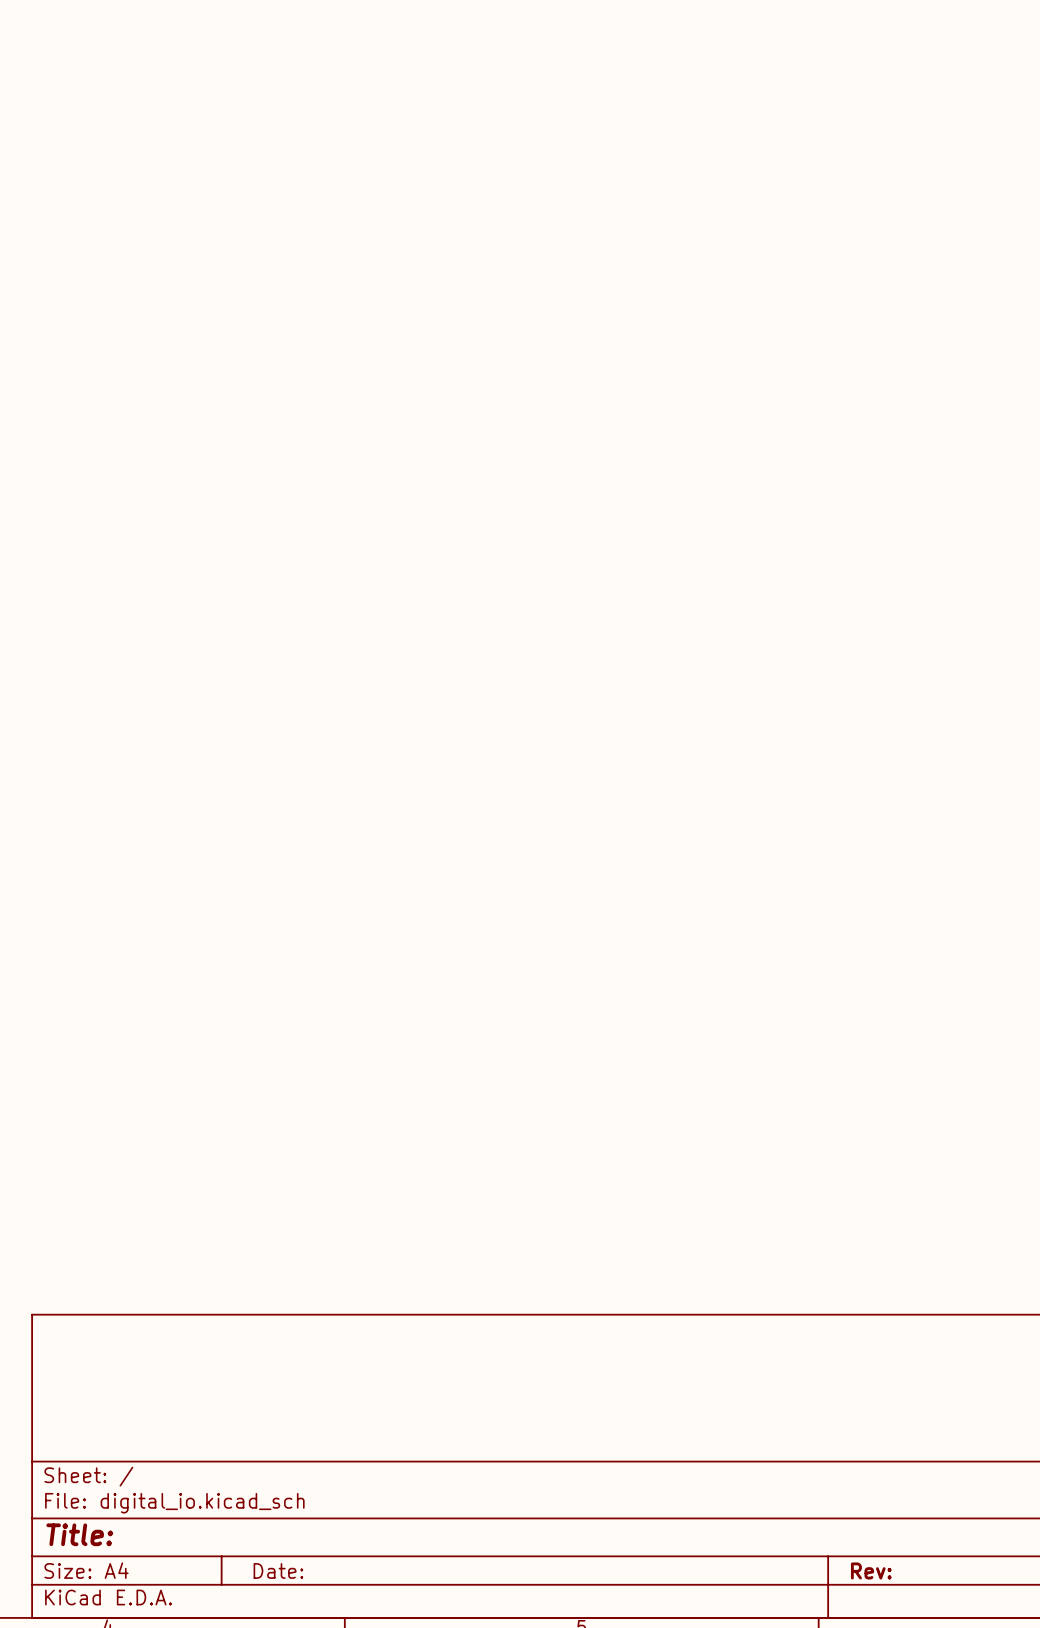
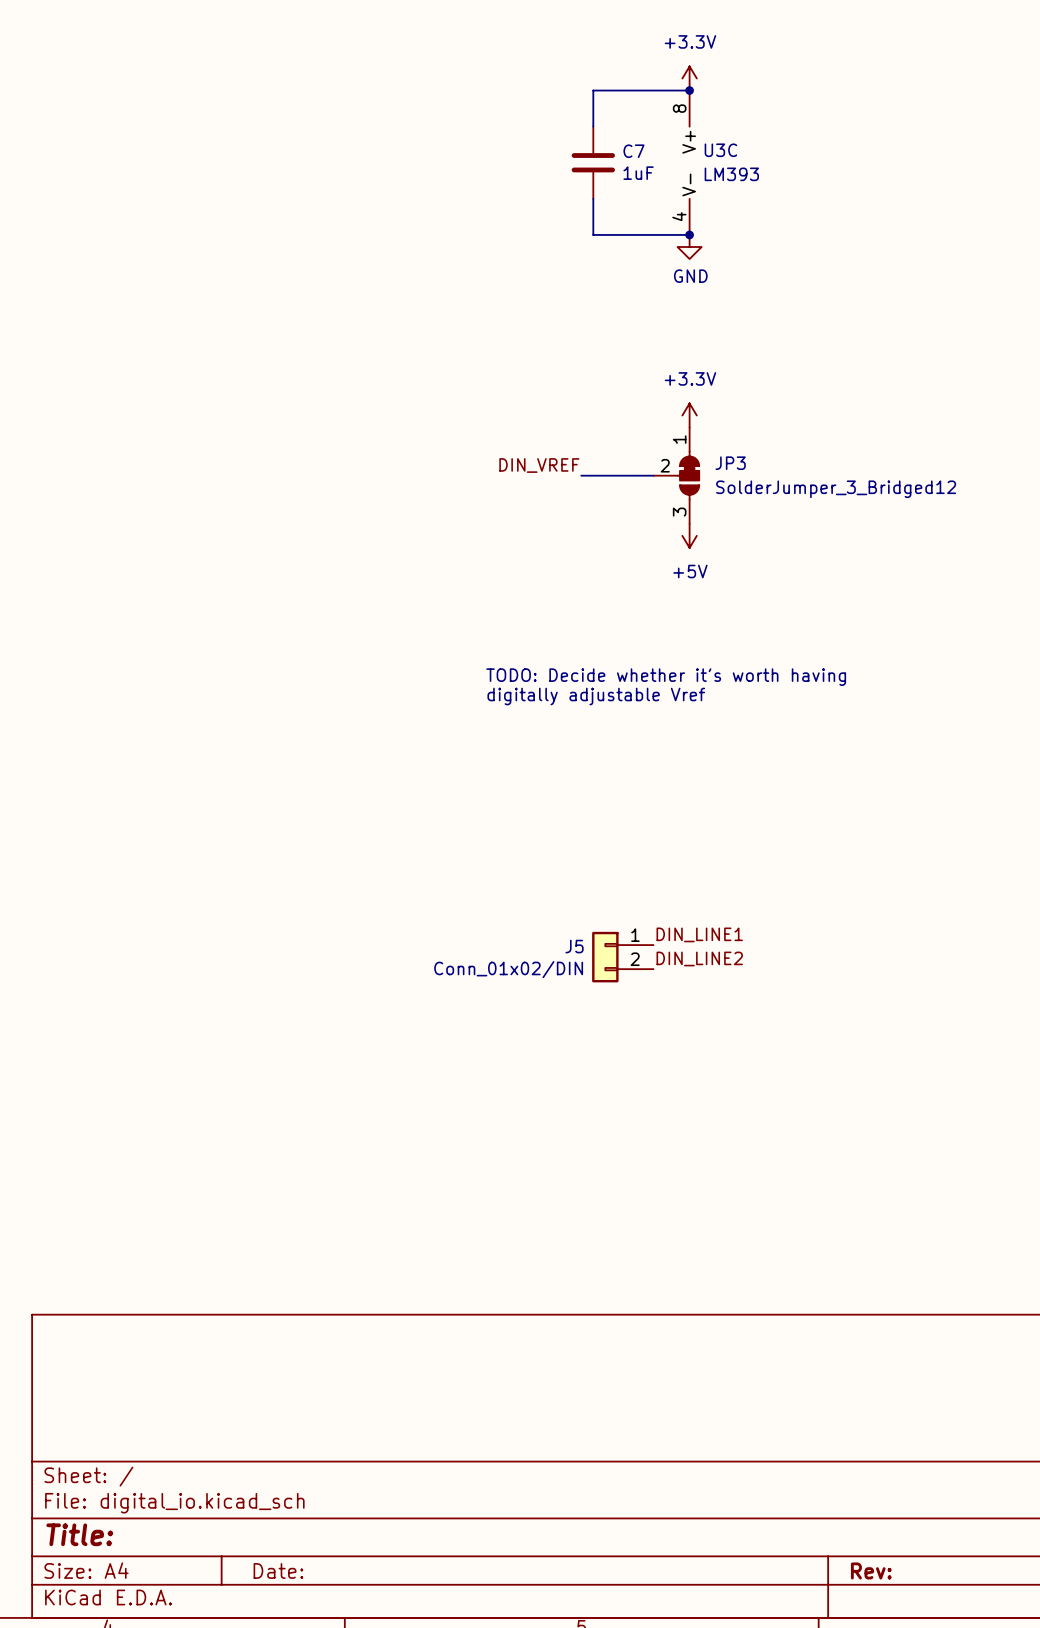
power symbol: none -> +3.3V (689, 78)
wire: none -> (689, 90) (593, 90) (593, 126)
junction: none -> (689, 90)
C7: none -> 1uF (593, 162)
U3C: none -> LM393 (689, 162)
wire: none -> (593, 198) (593, 234) (689, 234)
junction: none -> (689, 234)
power symbol: none -> GND (689, 247)
power symbol: none -> +3.3V (689, 415)
label: none -> DIN_VREF (539, 465)
wire: none -> (581, 475) (653, 475)
JP3: none -> SolderJumper_3_Bridged12 (676, 475)
power symbol: none -> +5V (689, 535)
text: none -> TODO: Decide whether it's worth having (666, 677)
text: none -> digitally adjustable Vref (596, 696)
label: none -> DIN_LINE1 (699, 934)
J5: none -> Conn_01x02/DIN (622, 957)
label: none -> DIN_LINE2 (699, 958)

